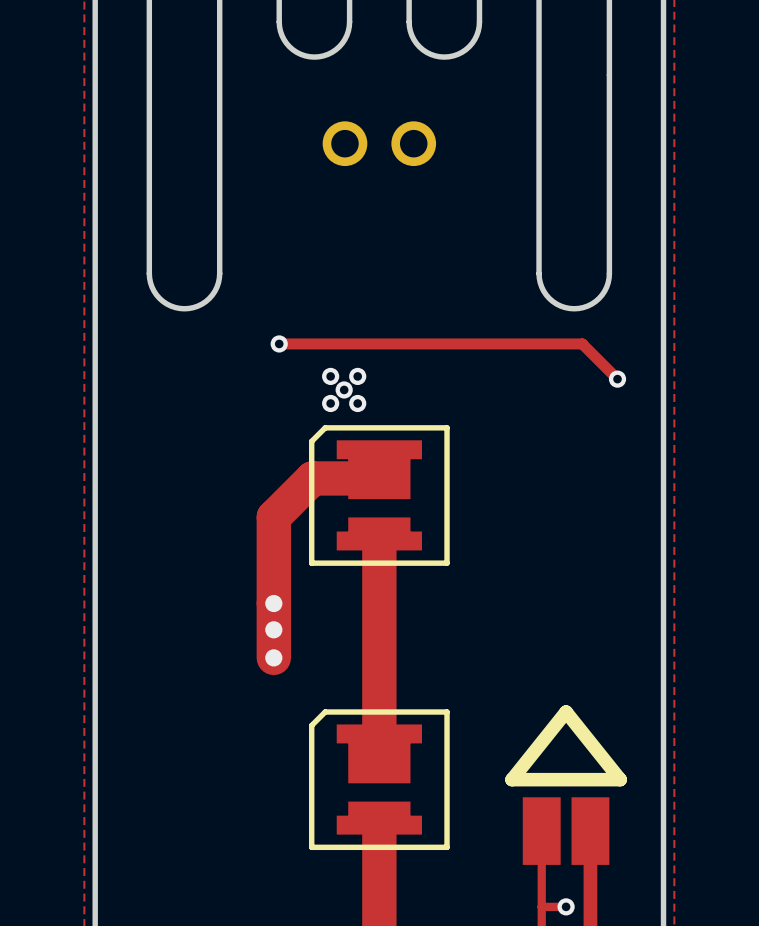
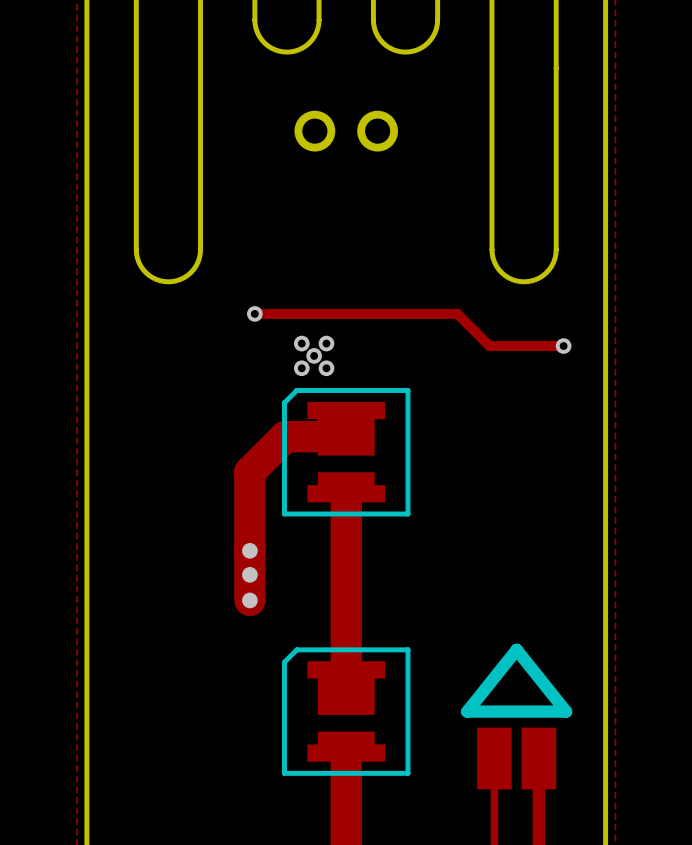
track: (501, 343) (582, 343) (617, 379) -> (457, 313) (489, 346) (563, 346)
track: (541, 906) (566, 906) -> none
via: (566, 906) -> none

